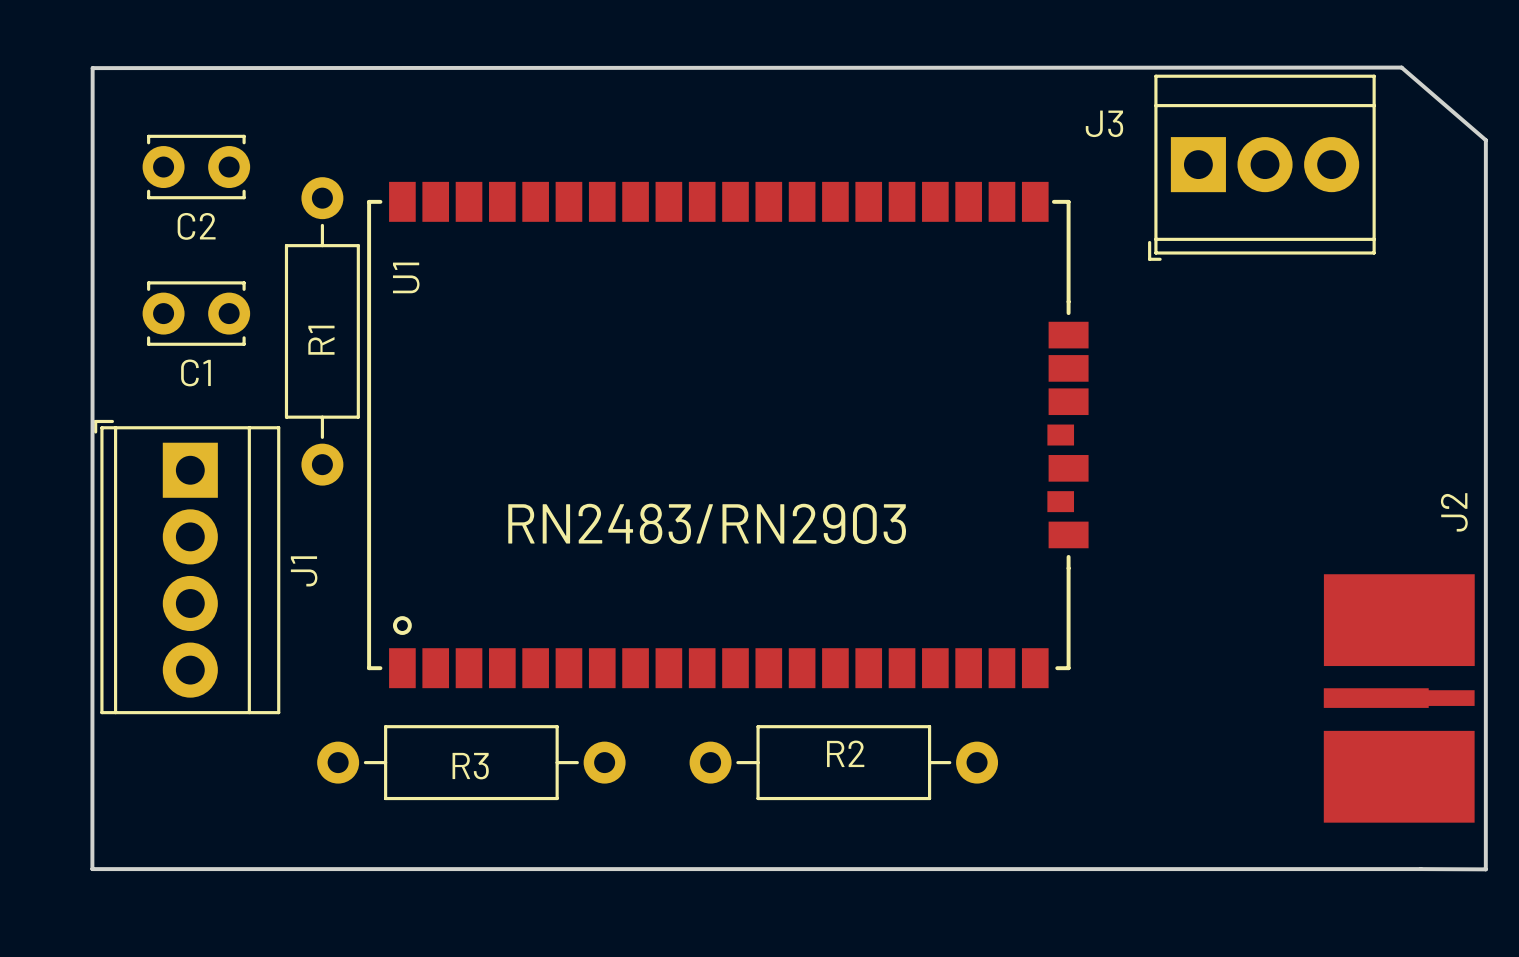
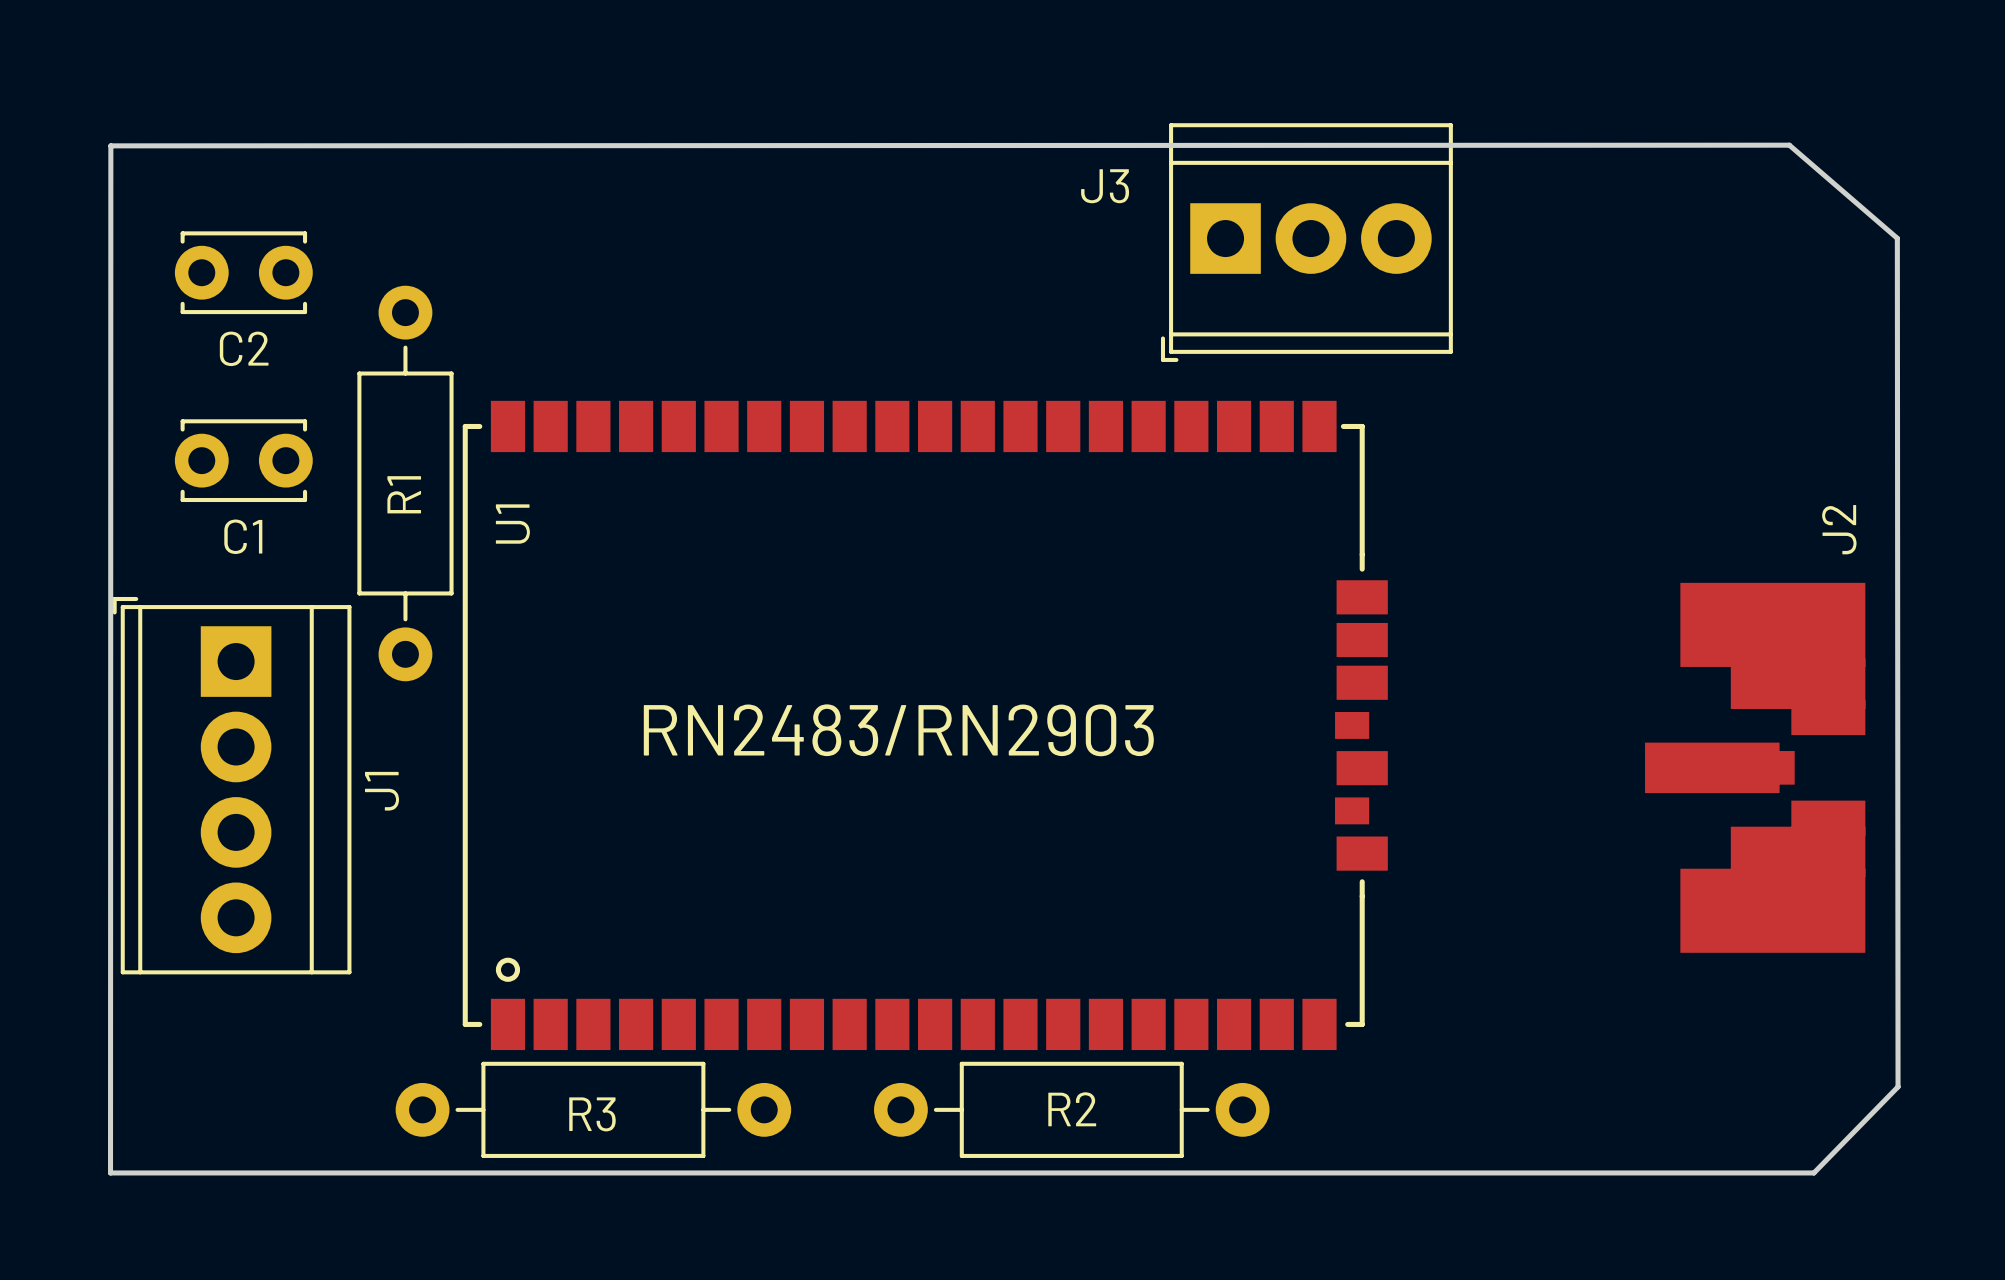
board edge: (1485, 140) (1485, 869) (1420, 869) -> (1897, 238) (1898, 1086) (1813, 1172)
J3 position: (1261, 167) -> (1306, 242)
U1 position: (727, 435) -> (925, 725)
J2 footprint: [1323, 574, 1475, 823] -> [1645, 582, 1866, 953]
R2 name position: R2 (845, 753) -> R2 (1072, 1109)
R3 position: (471, 762) -> (593, 1109)
R2 position: (843, 762) -> (1071, 1109)

